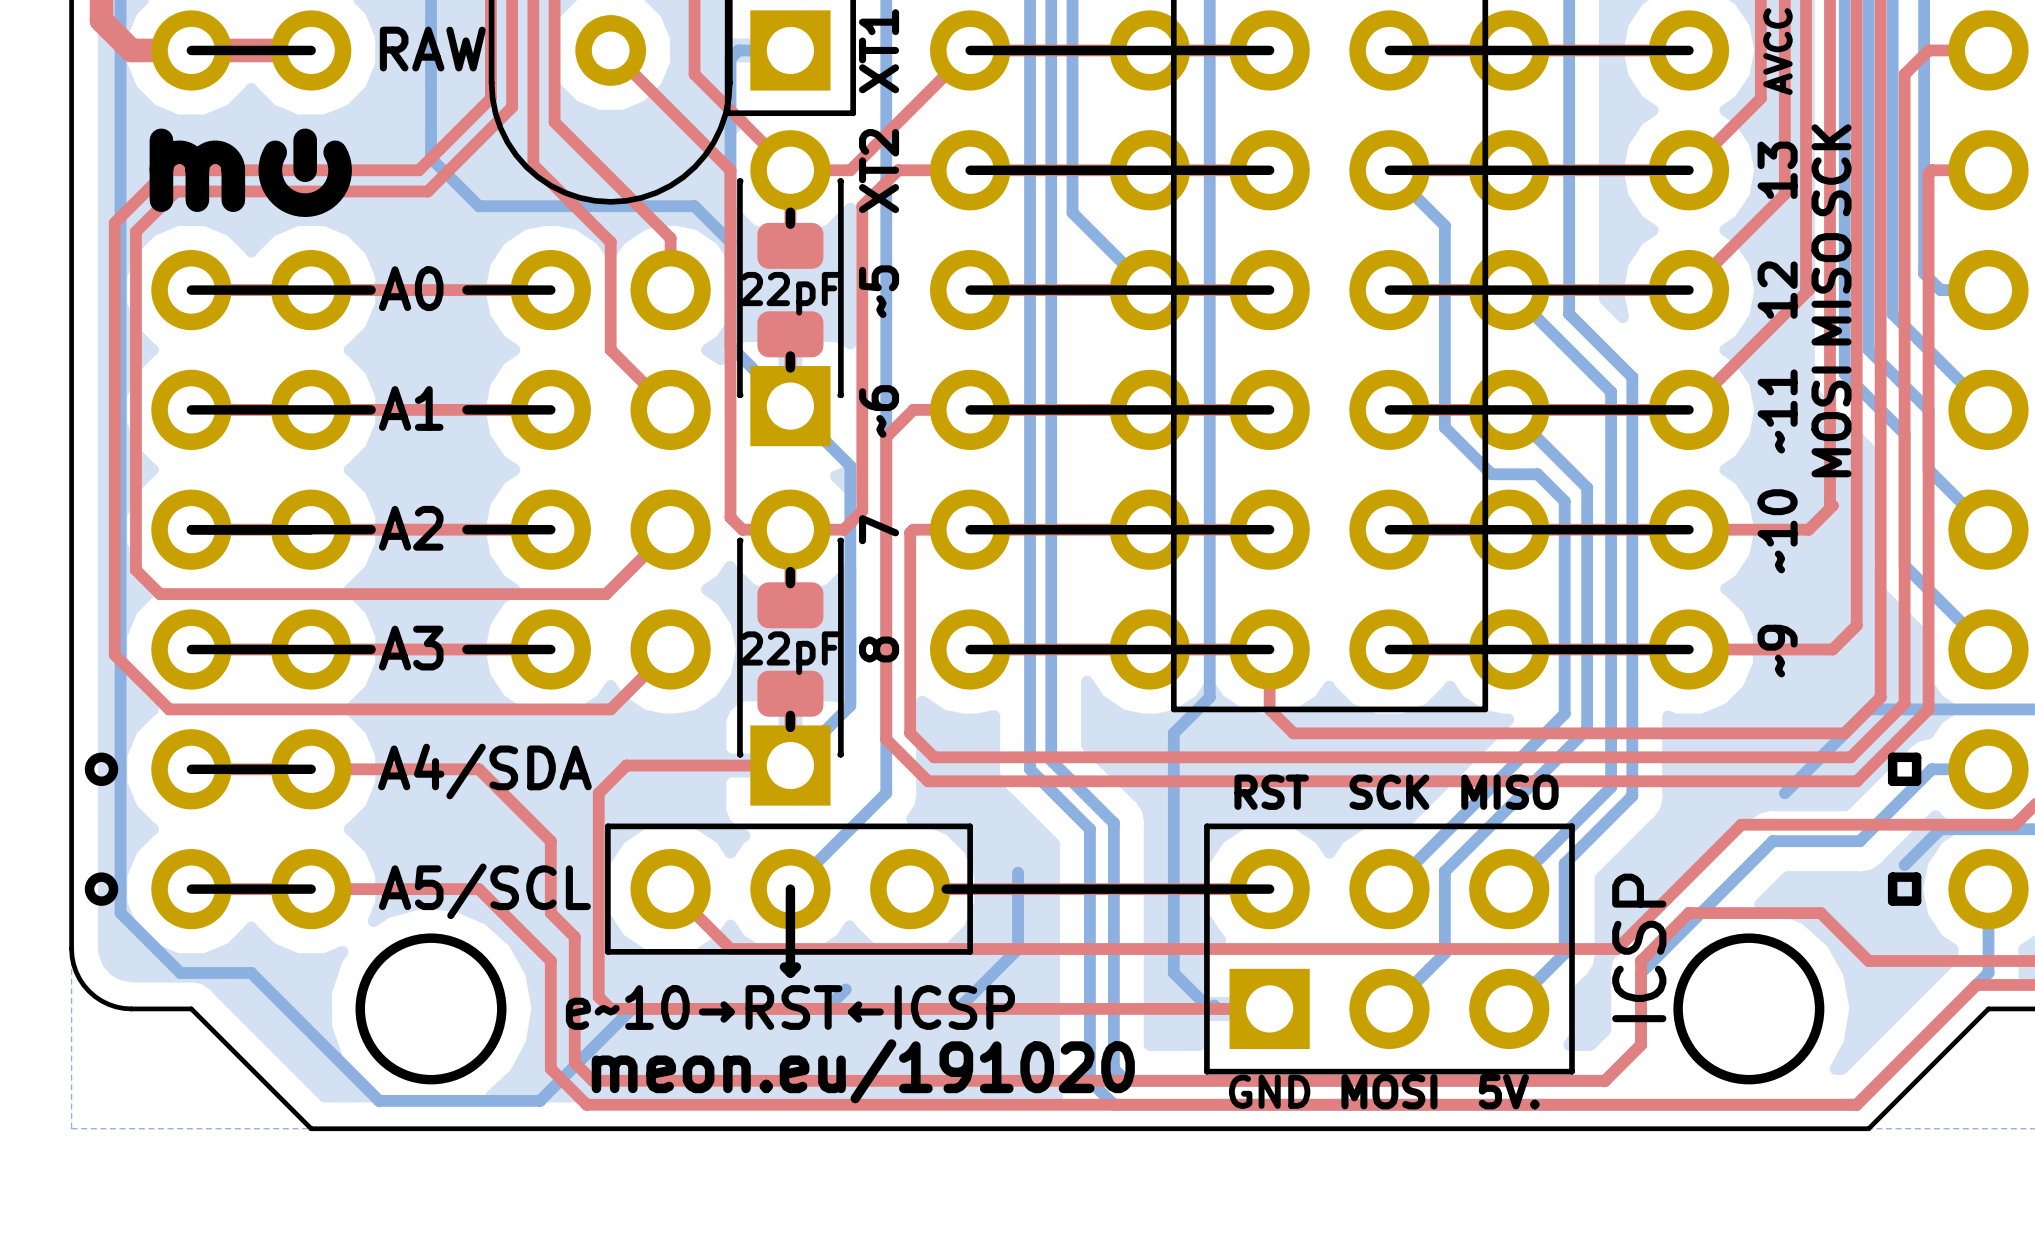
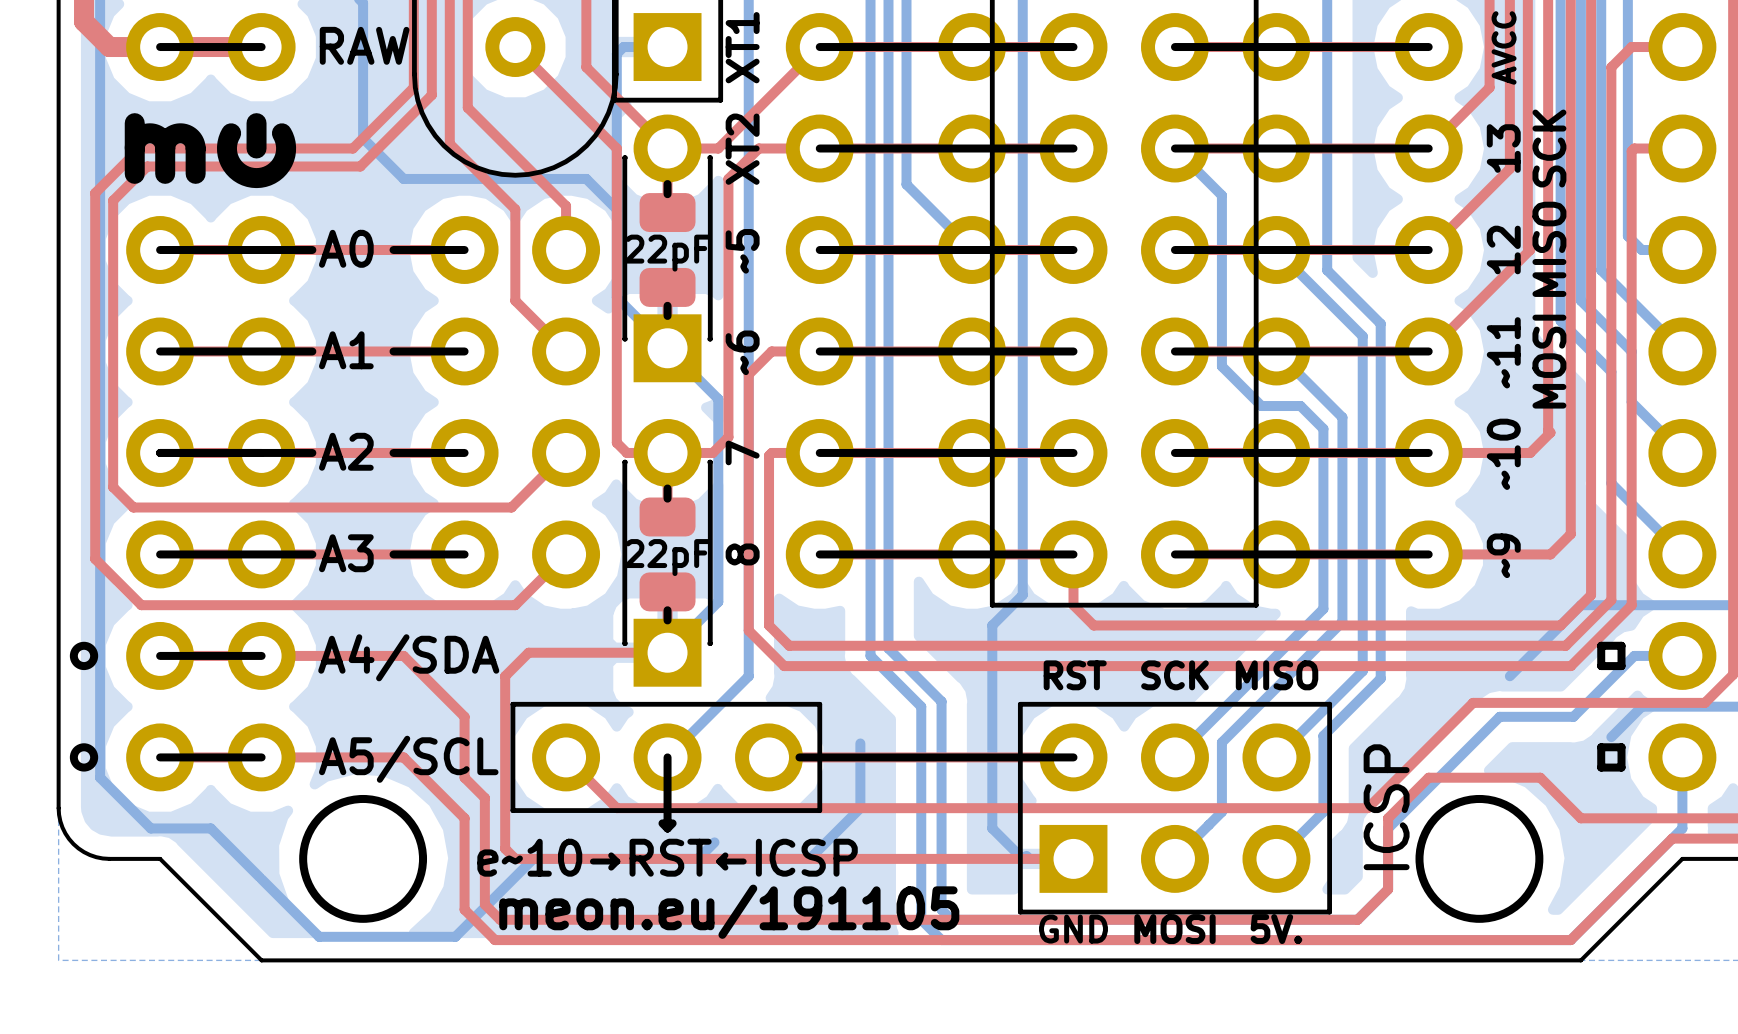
text: meon.eu/191020 (863, 1071) -> meon.eu/191105 (729, 911)

